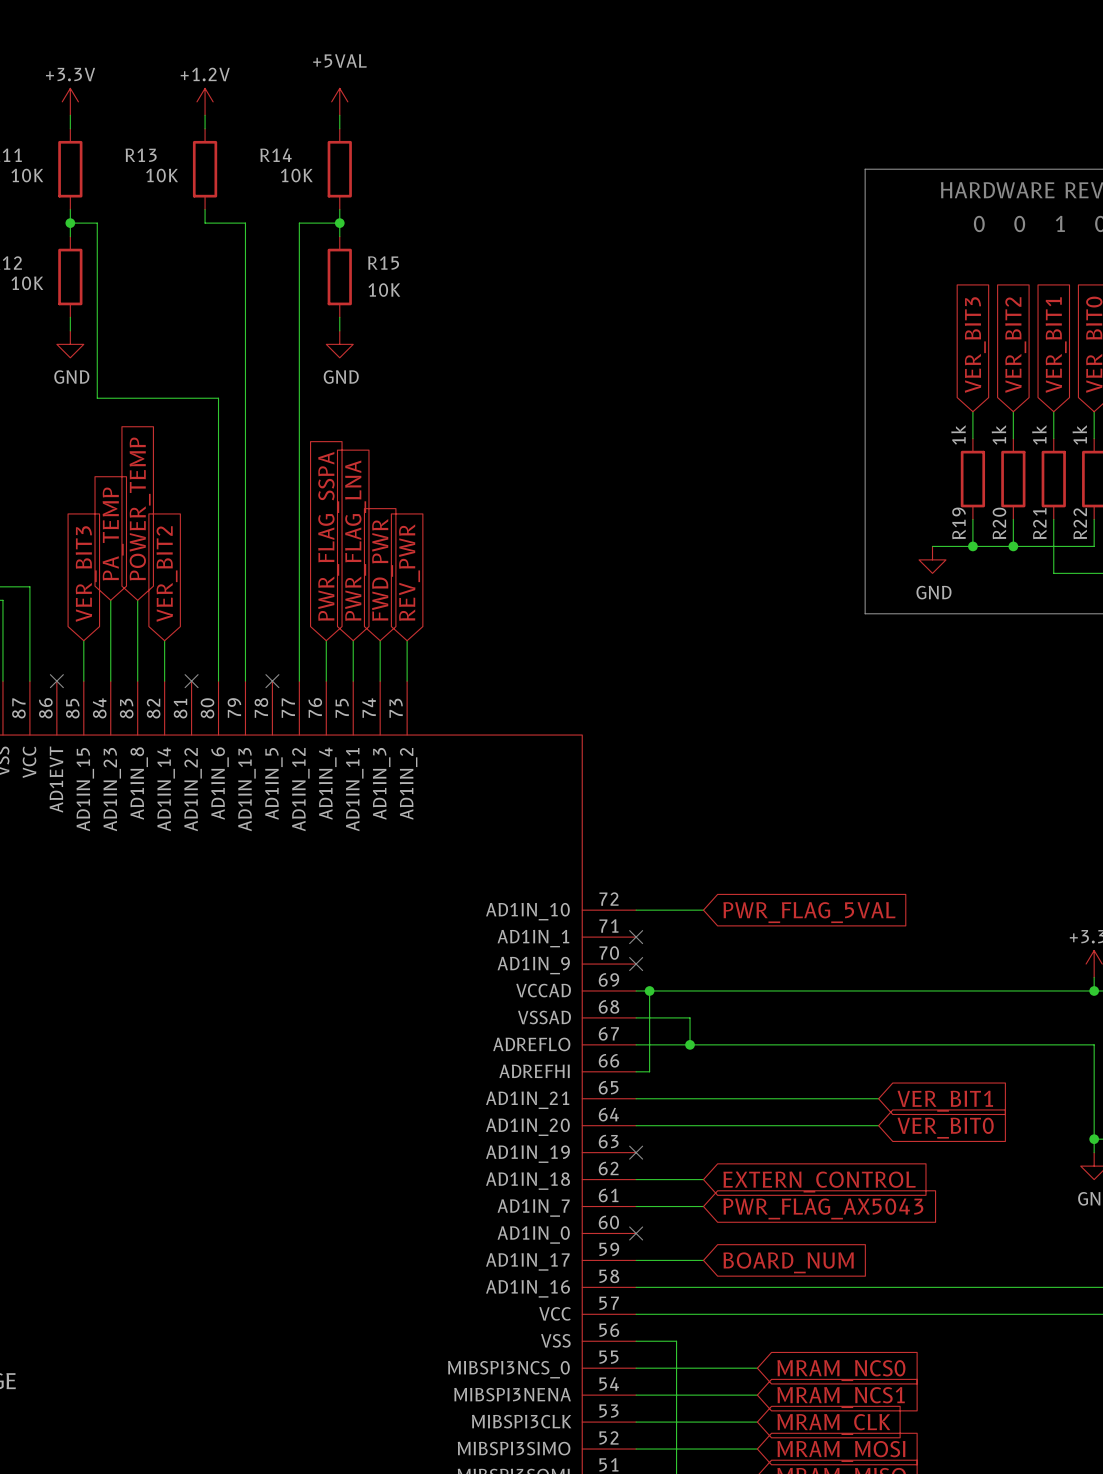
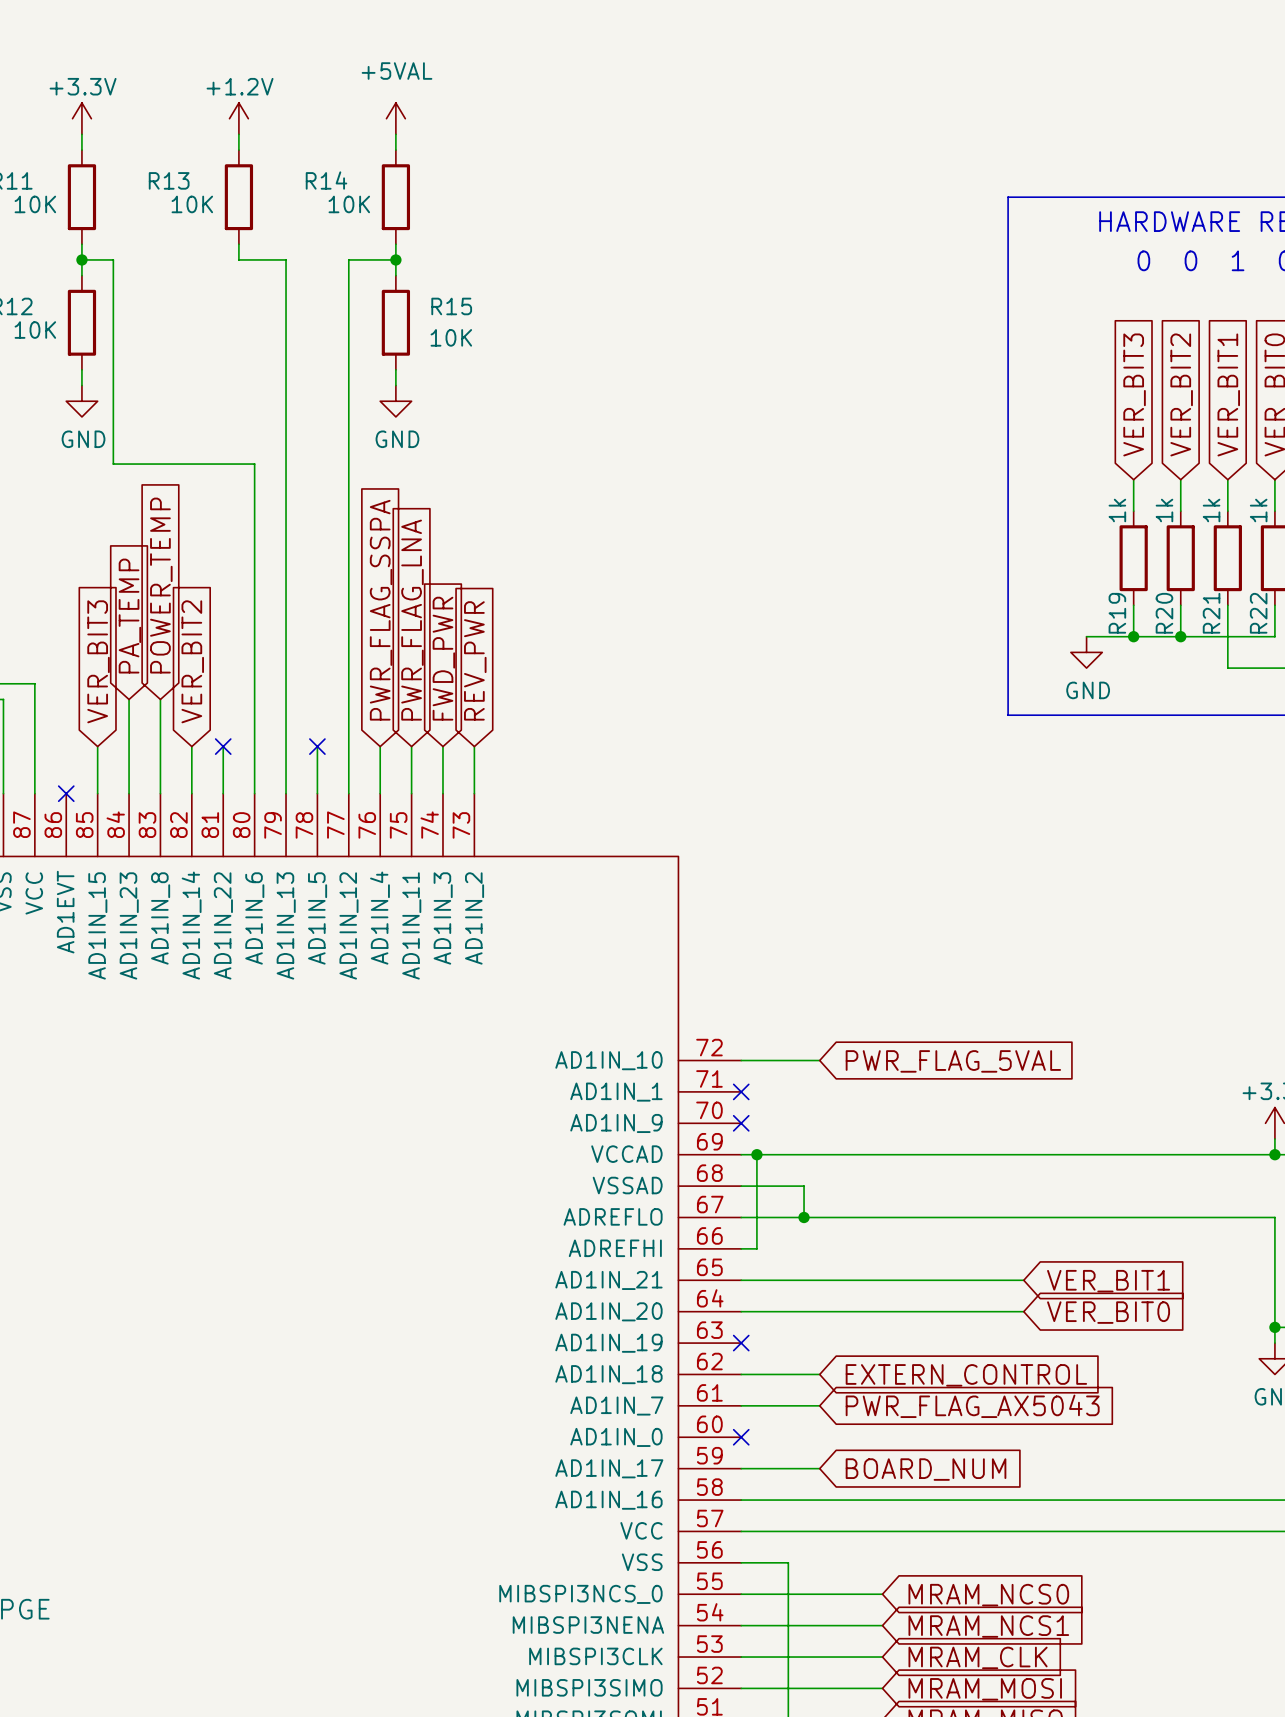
wire: none -> (223, 746) (223, 793)
wire: none -> (317, 746) (317, 793)
no-connect mark position: (191, 681) -> (223, 746)
no-connect mark position: (272, 681) -> (317, 746)

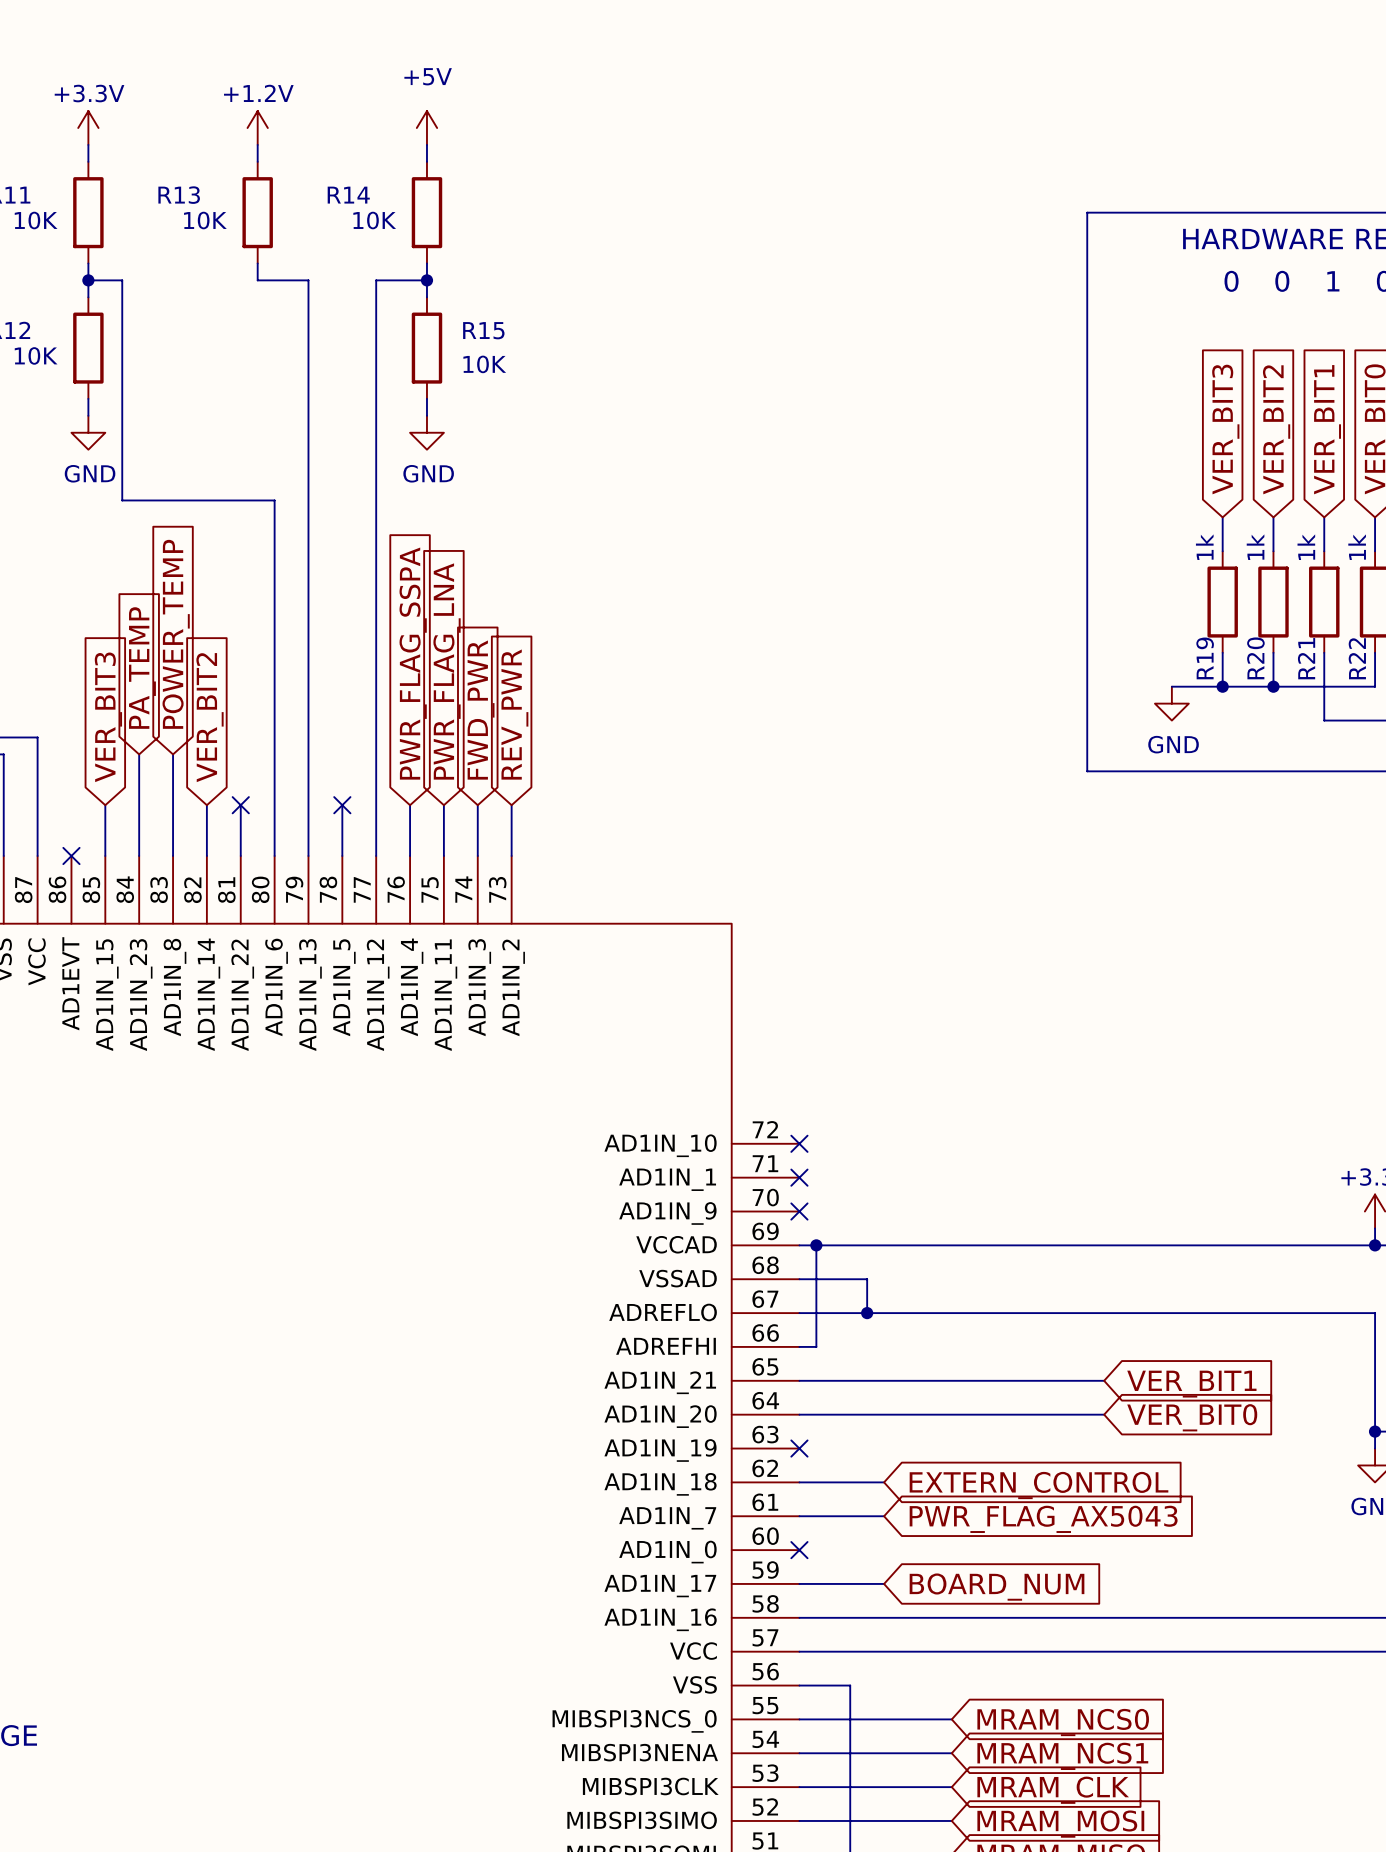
power symbol: +5VAL (395, 118) -> +5V (426, 128)
wire: (741, 1060) (819, 1060) -> none
no-connect mark: none -> (799, 1143)
global label: PWR_FLAG_5VAL (953, 1061) -> none

